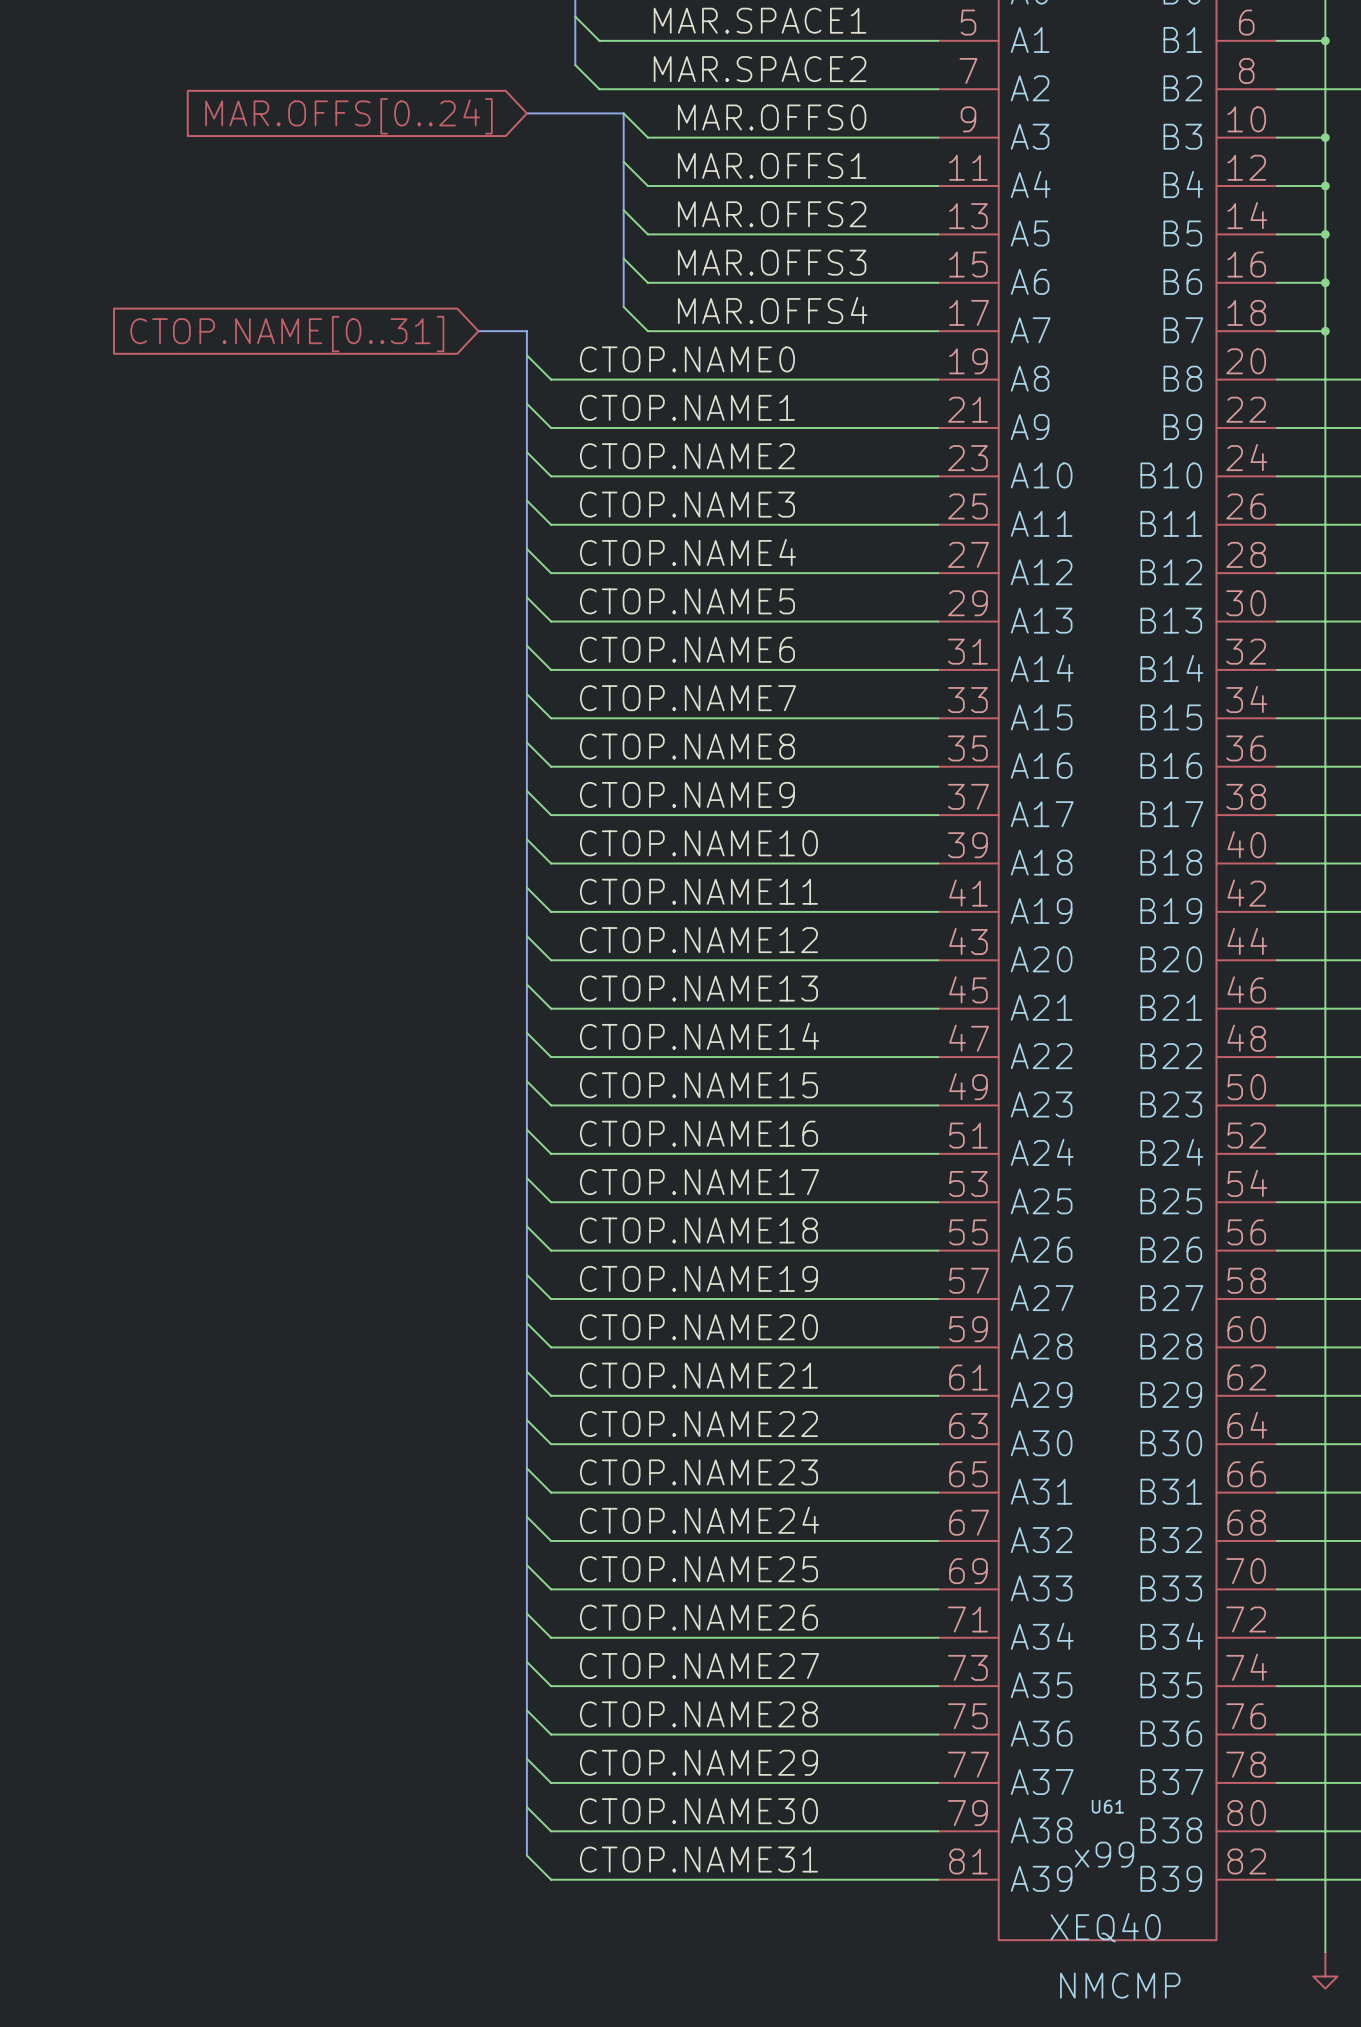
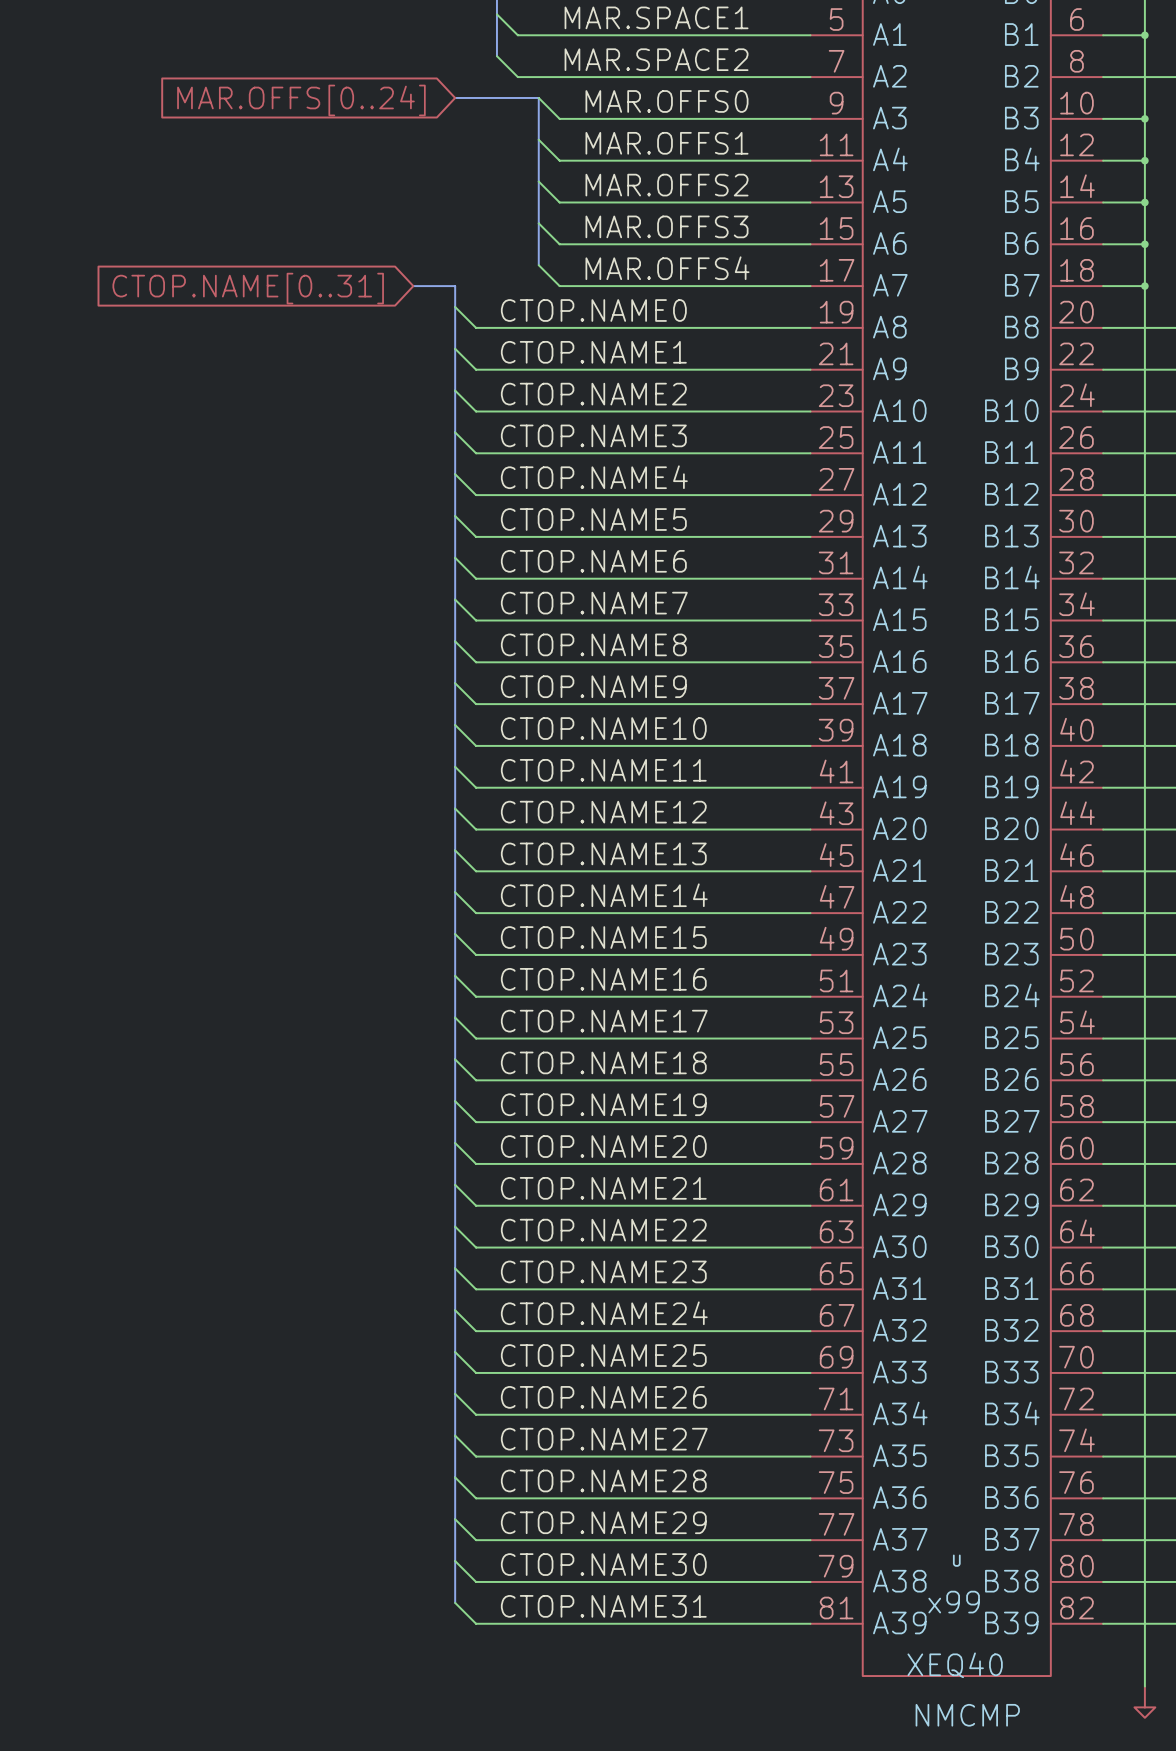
U61 name: U61 (1107, 1806) -> U (956, 1560)

